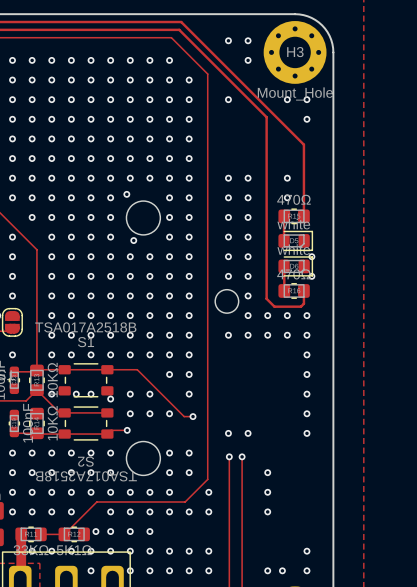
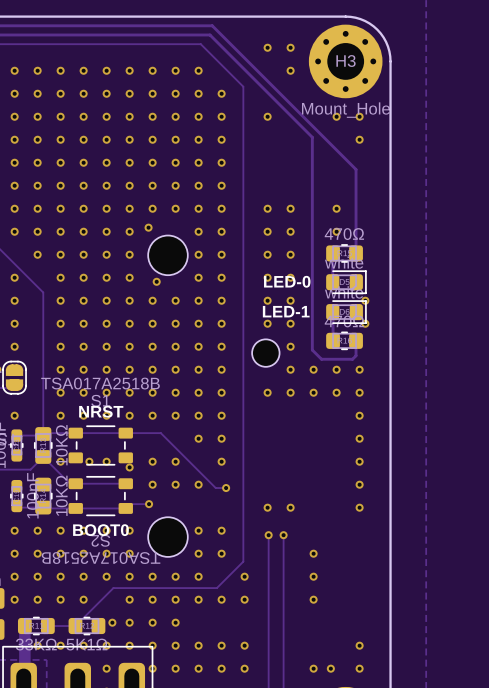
text: none -> LED-0 (287, 281)
text: none -> LED-1 (286, 311)
text: none -> NRST (101, 411)
text: none -> BOOT0 (100, 530)

